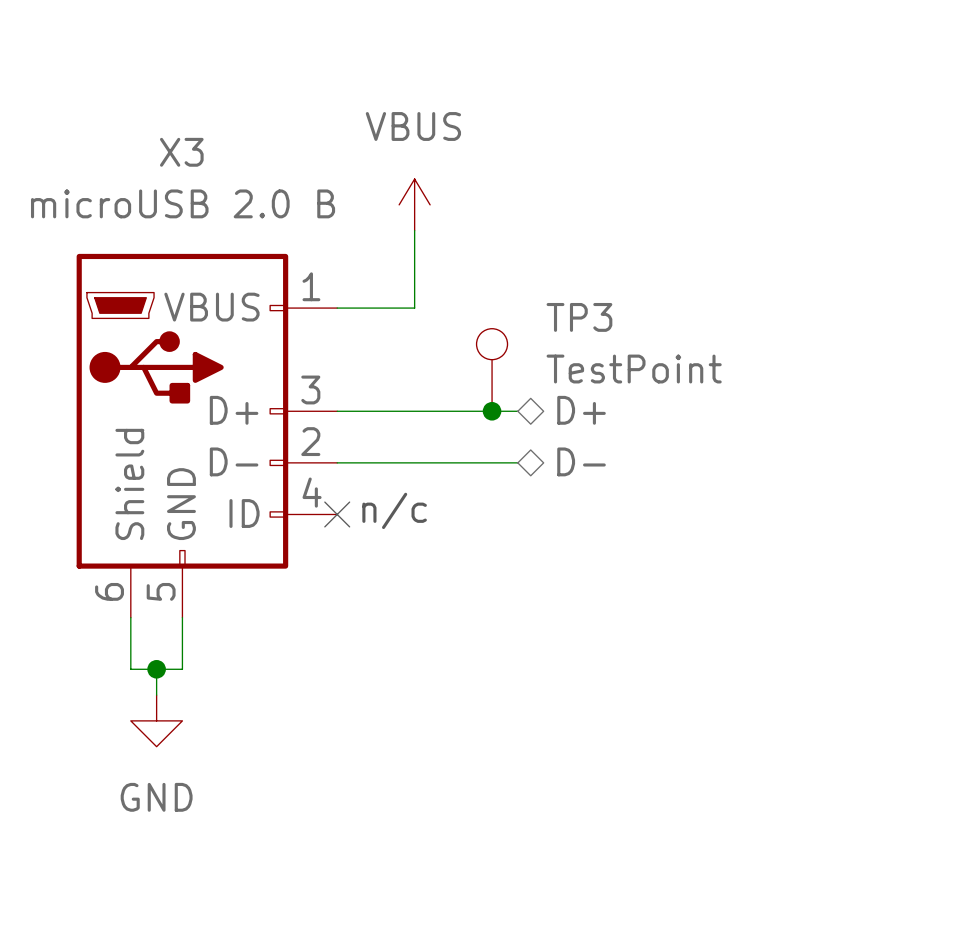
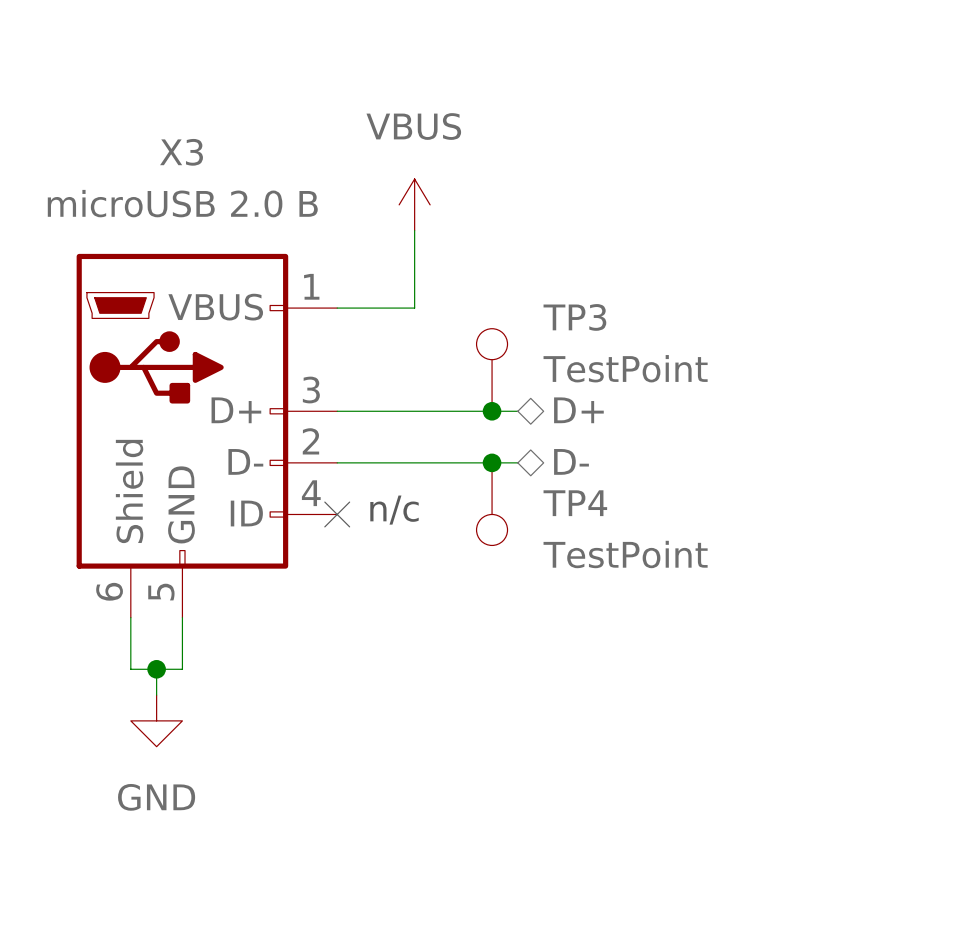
junction: none -> (492, 462)
TP4: none -> TestPoint (492, 504)

